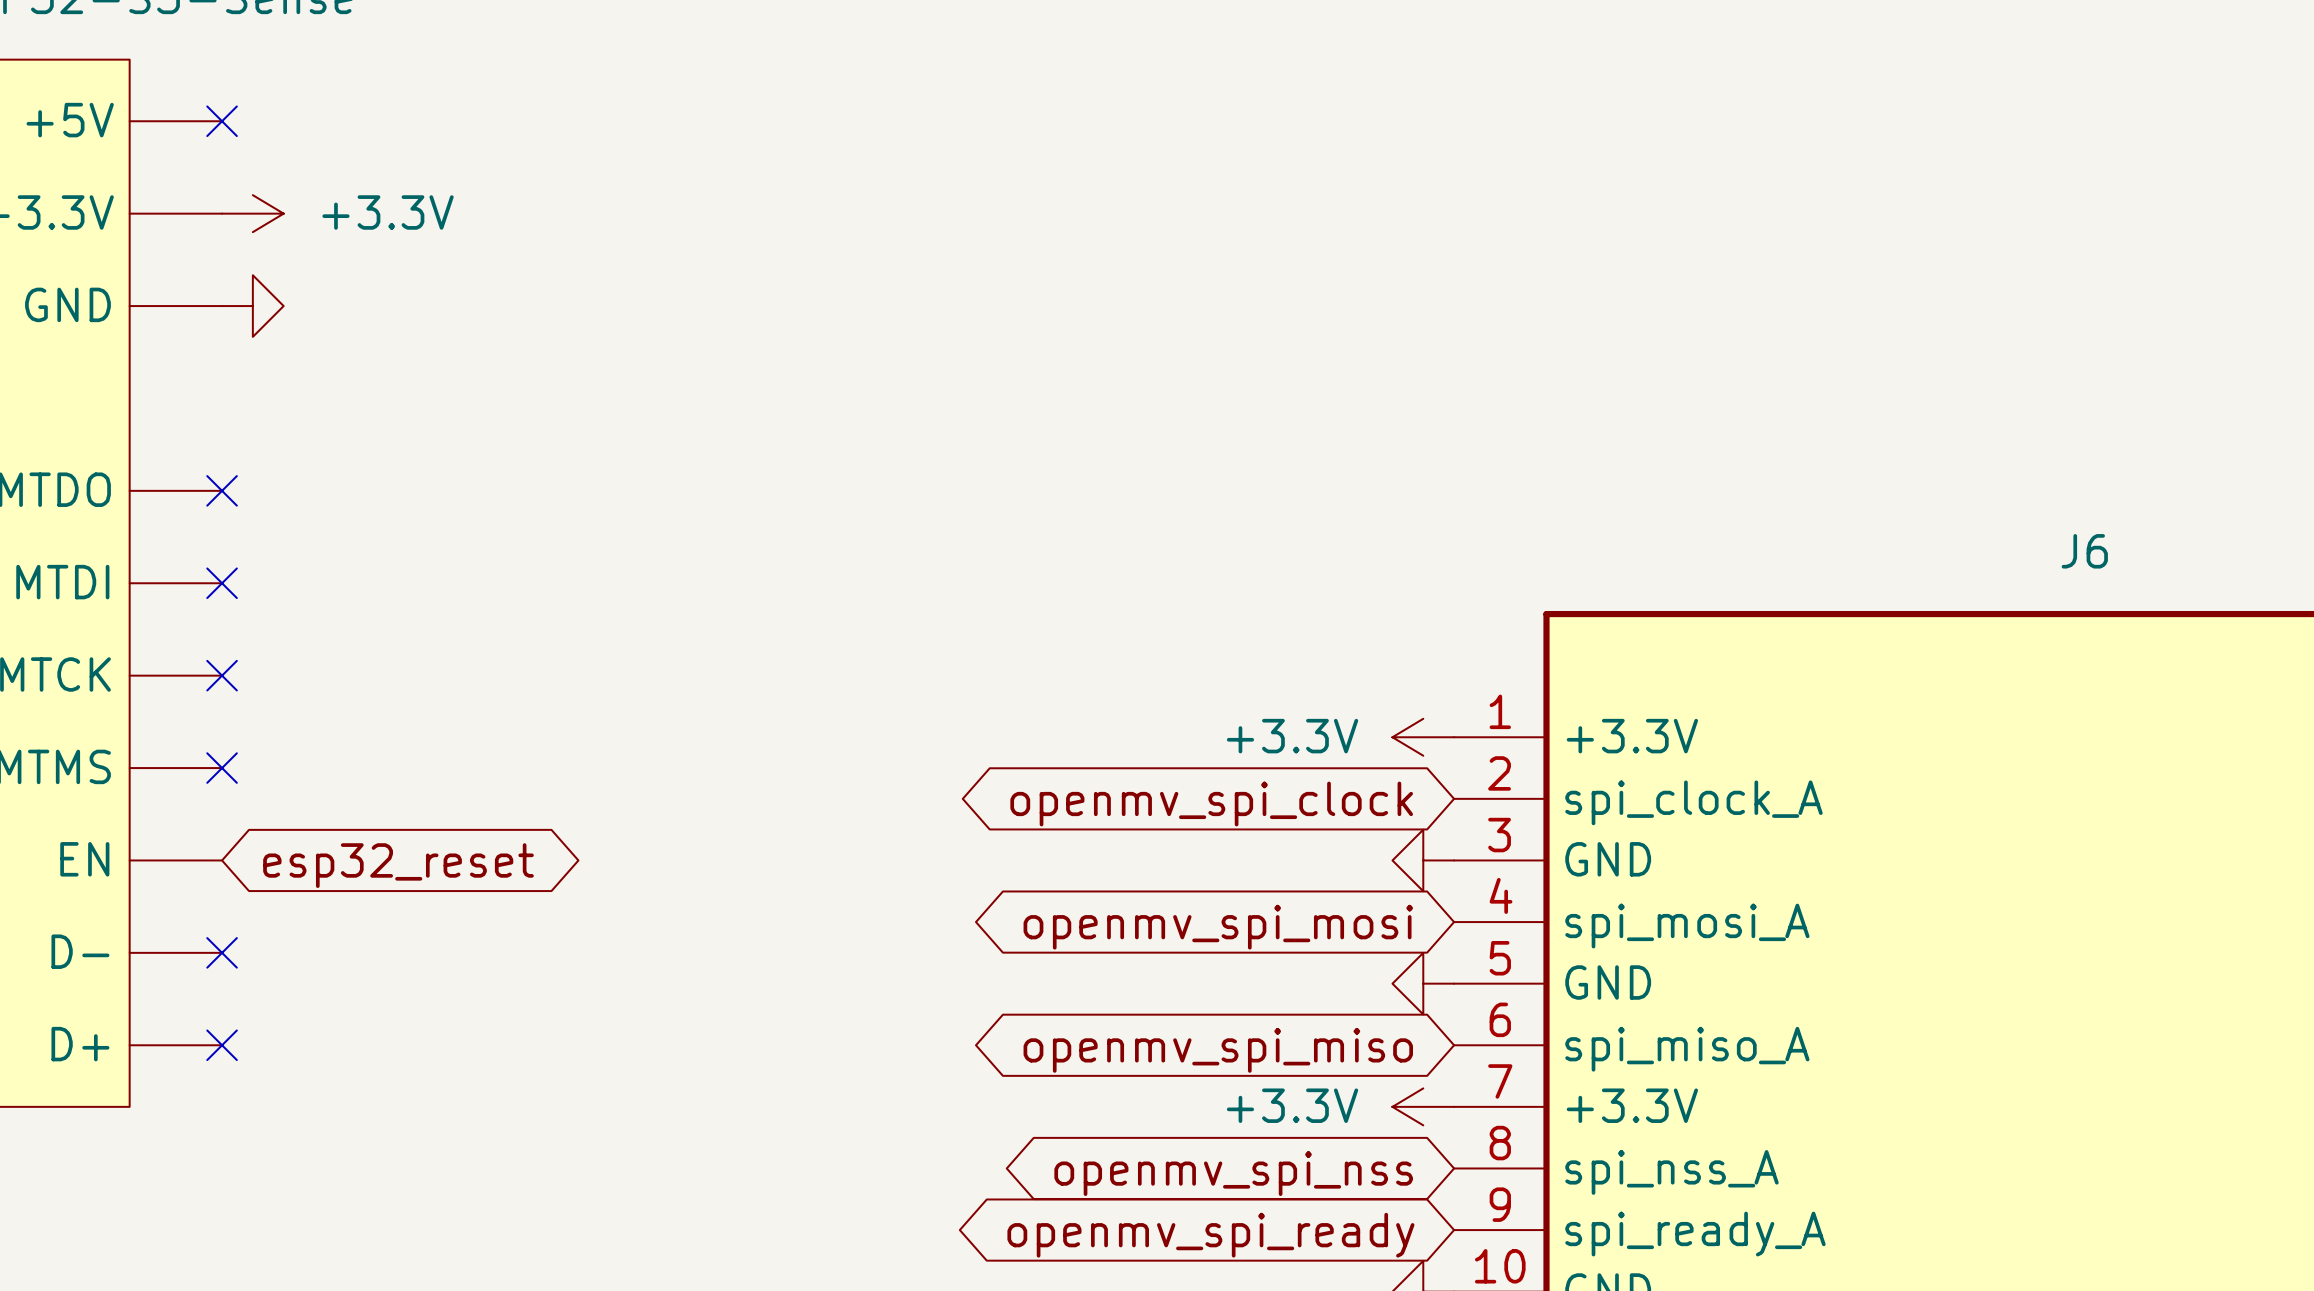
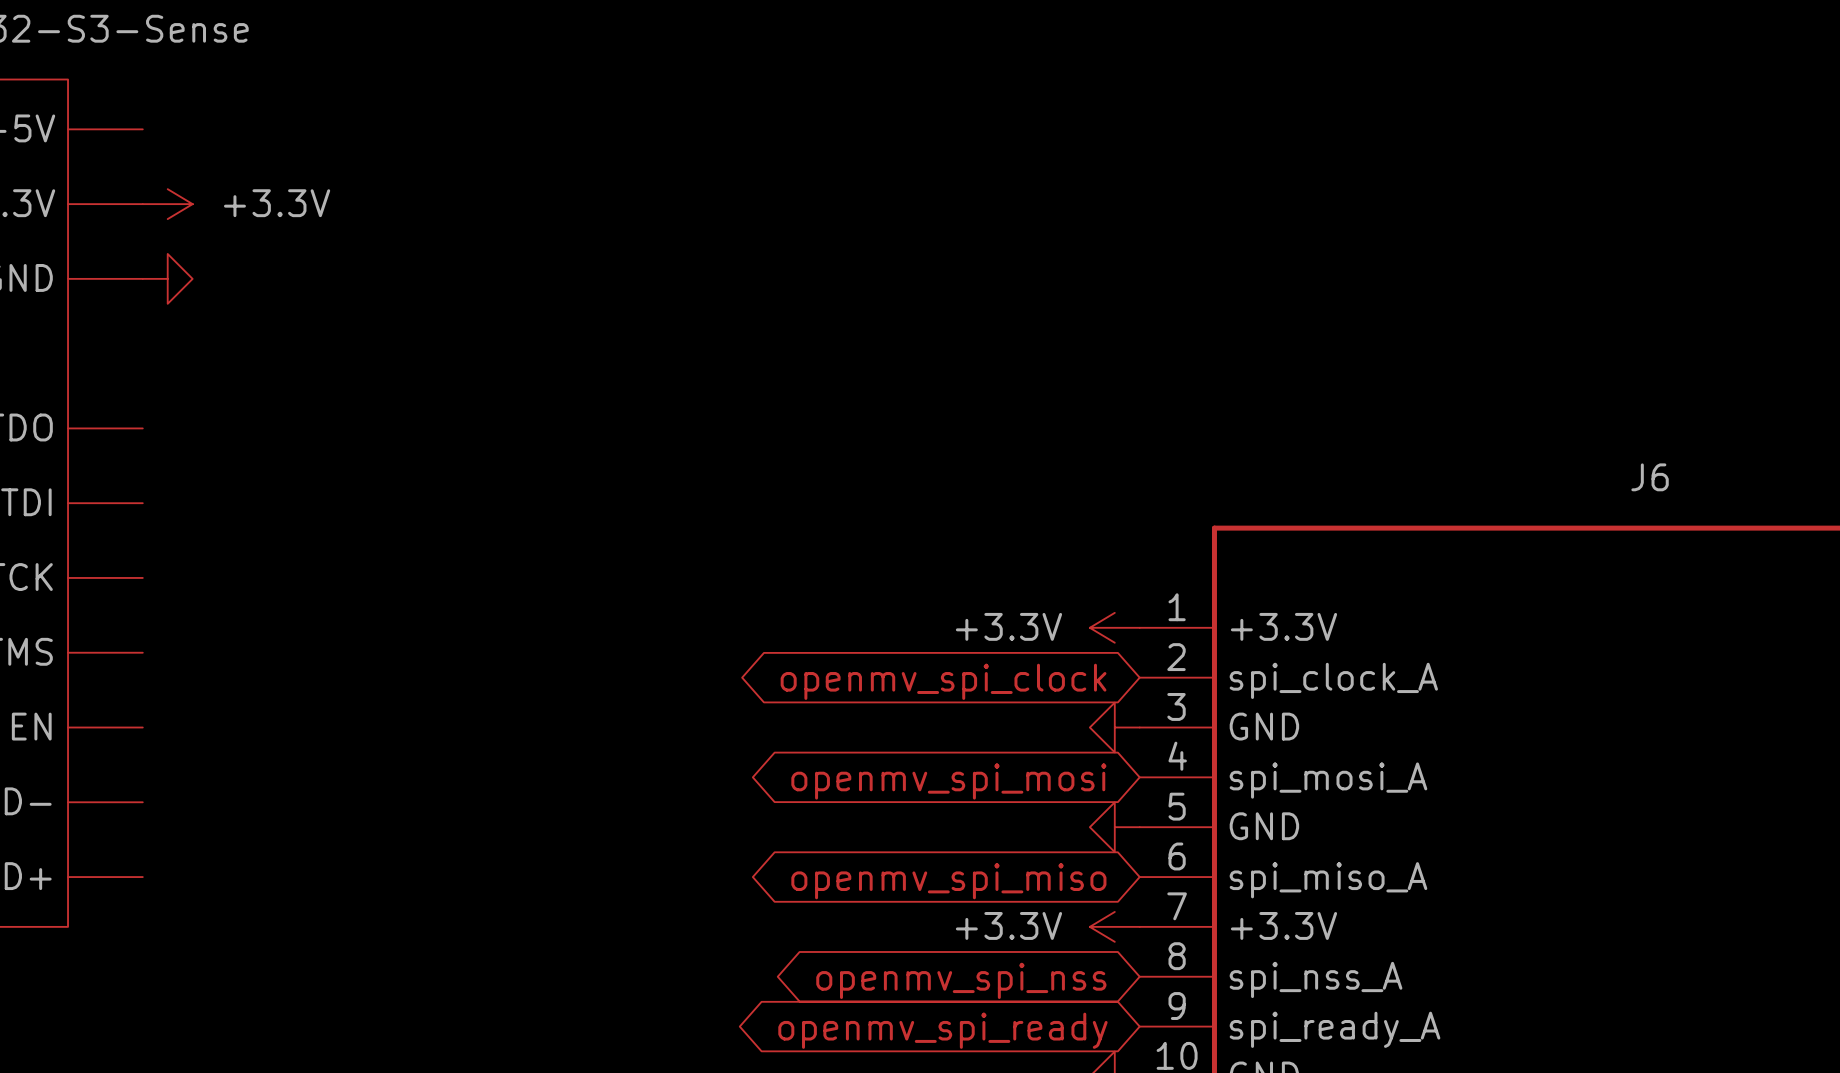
no-connect mark: (222, 121) -> none
no-connect mark: (222, 490) -> none
no-connect mark: (222, 583) -> none
no-connect mark: (222, 675) -> none
no-connect mark: (222, 768) -> none
global label: esp32_reset (398, 865) -> none
no-connect mark: (222, 952) -> none
no-connect mark: (222, 1045) -> none

